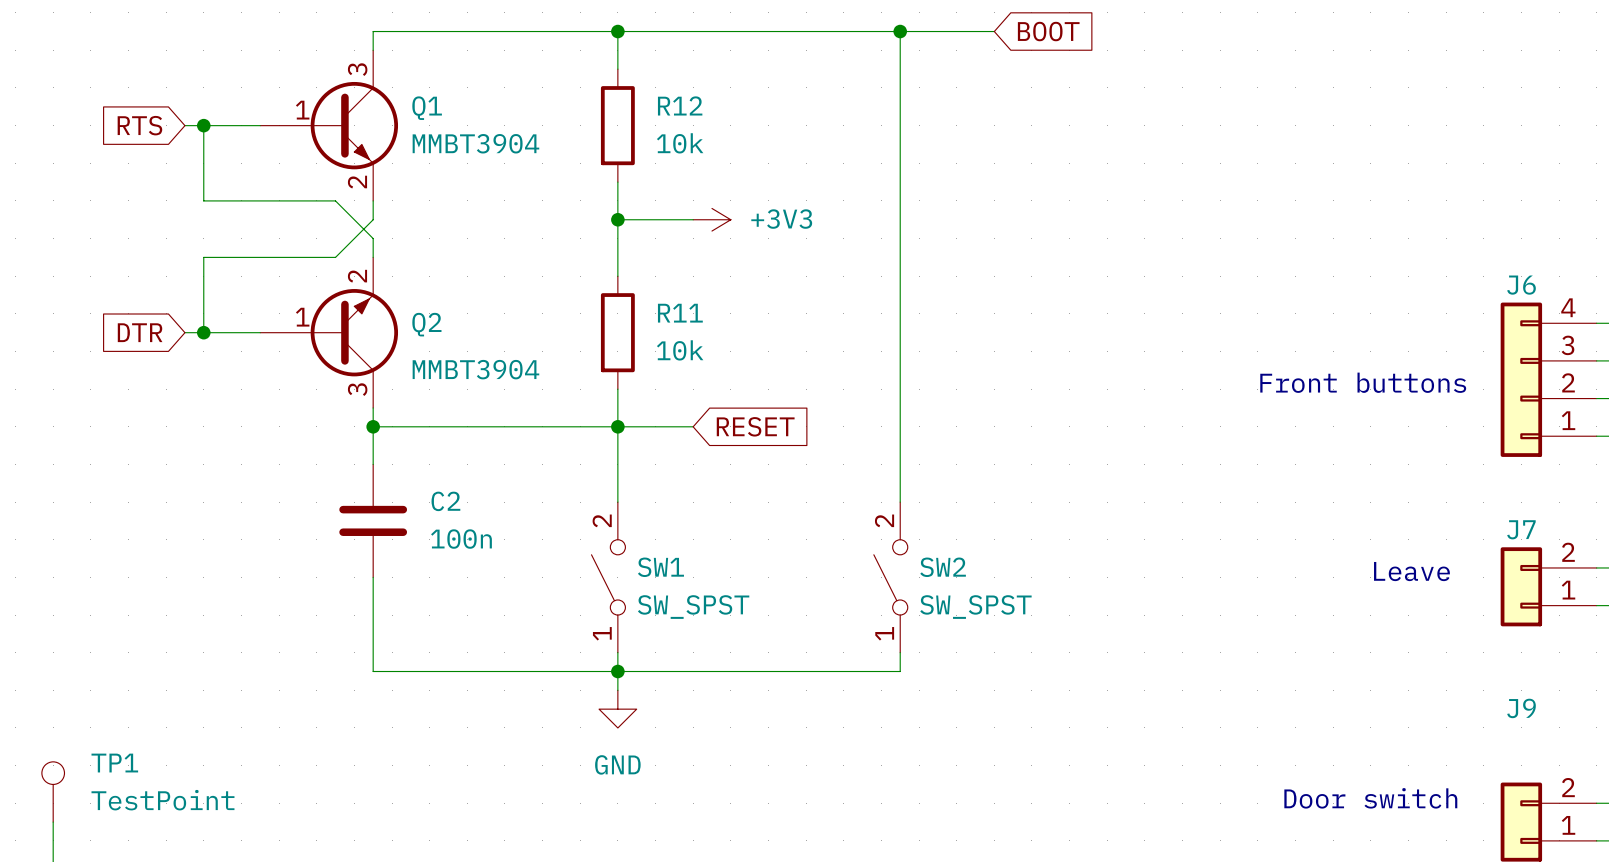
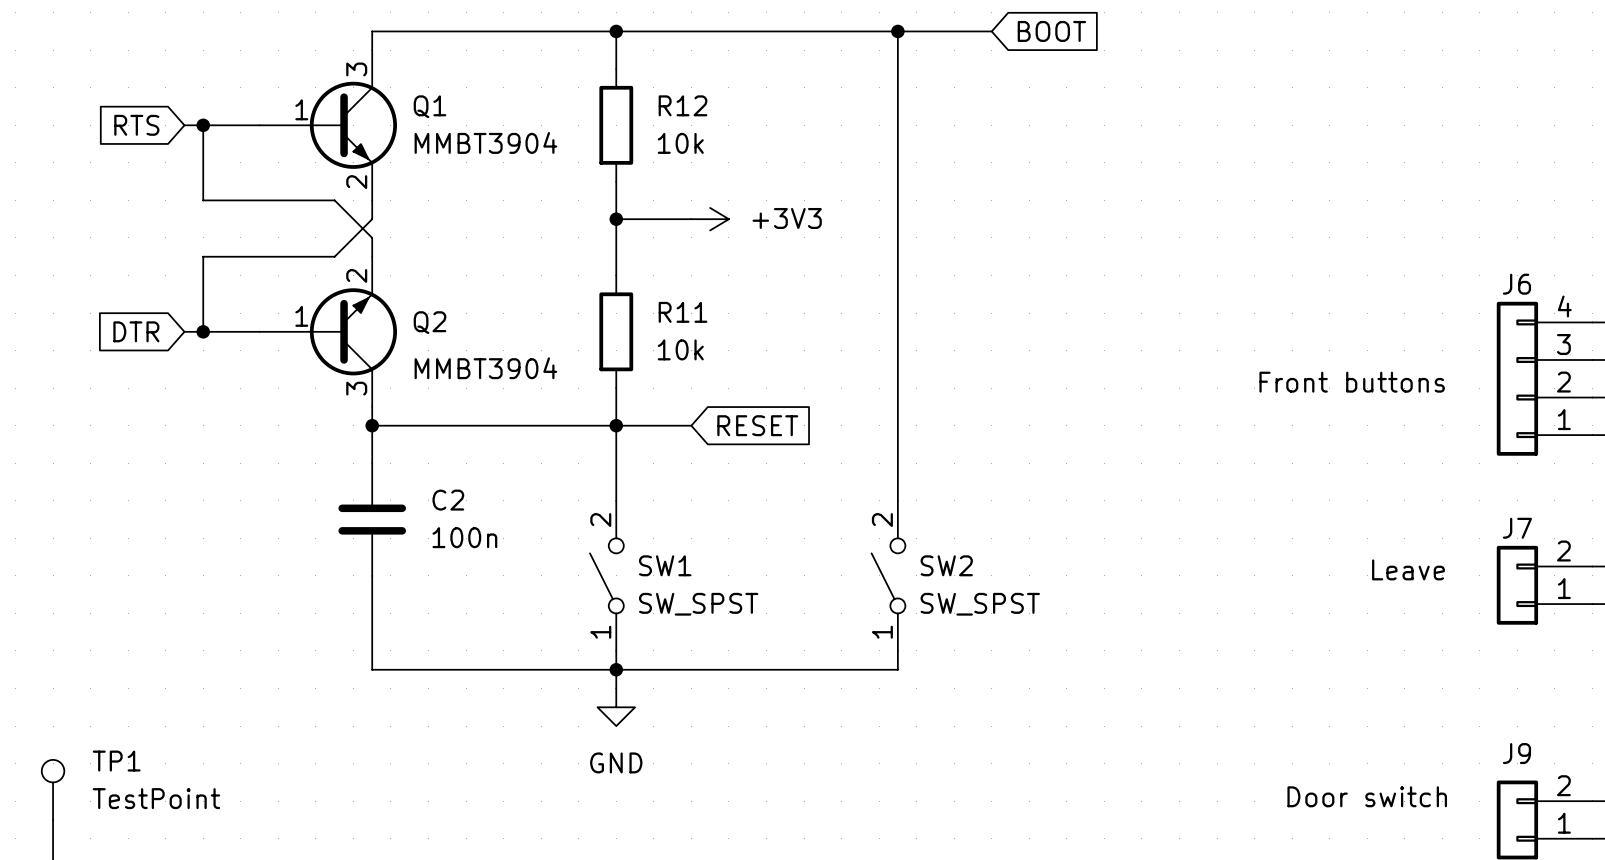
J9 name position: J9 (1521, 708) -> J9 (1516, 753)

